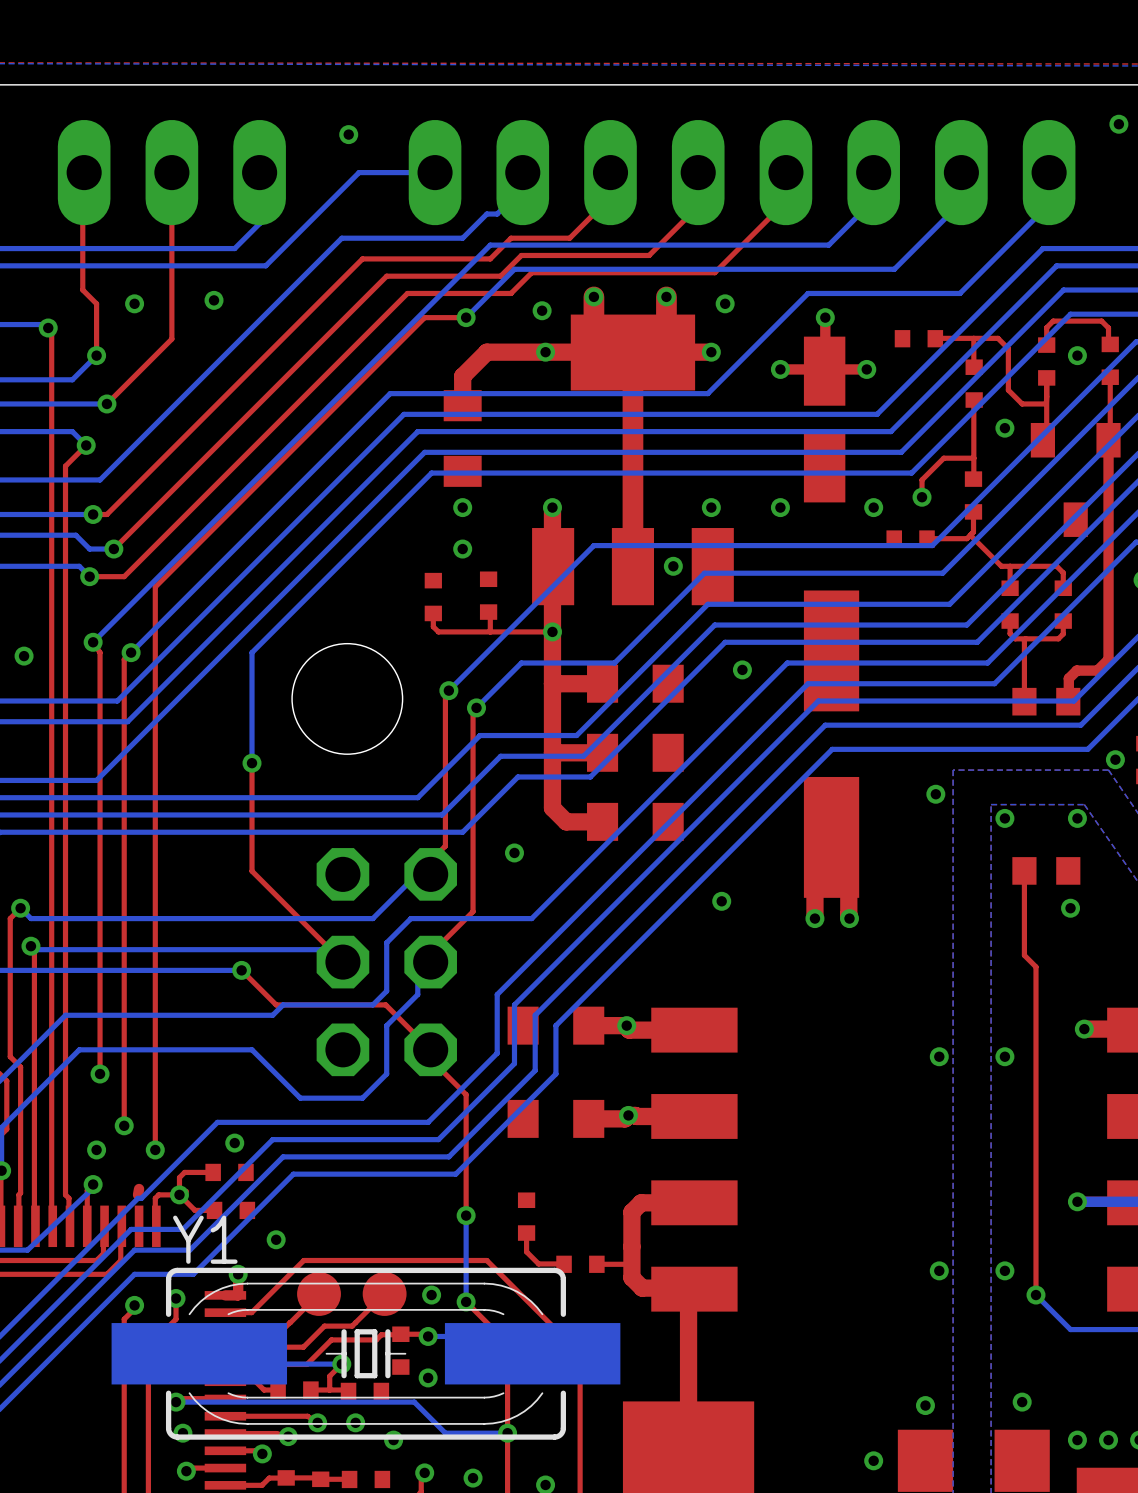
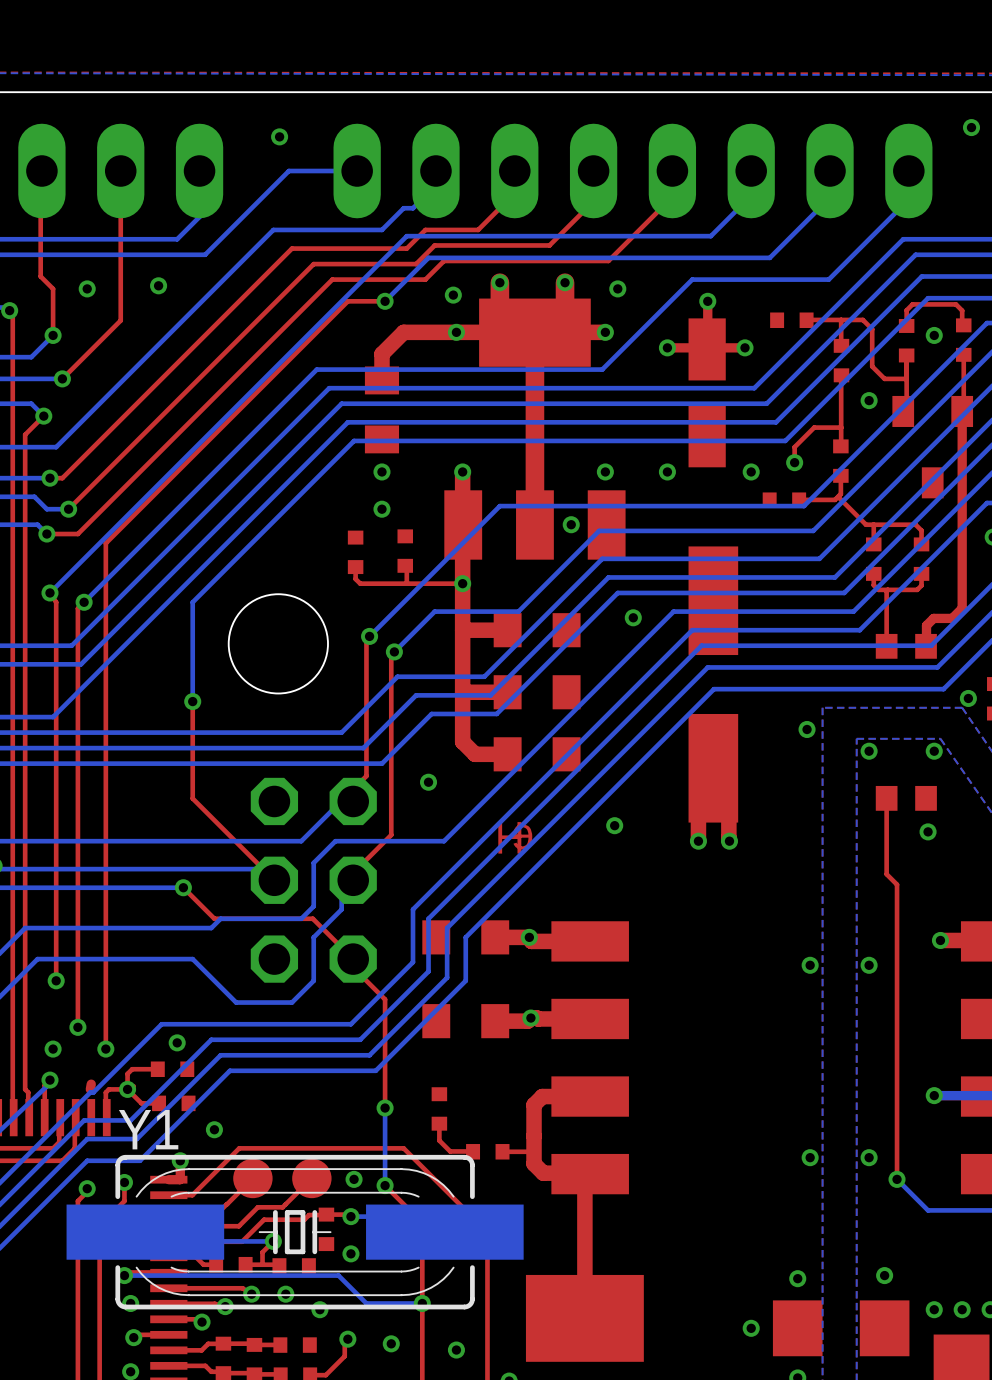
drawing: none -> [498, 822, 533, 854]

